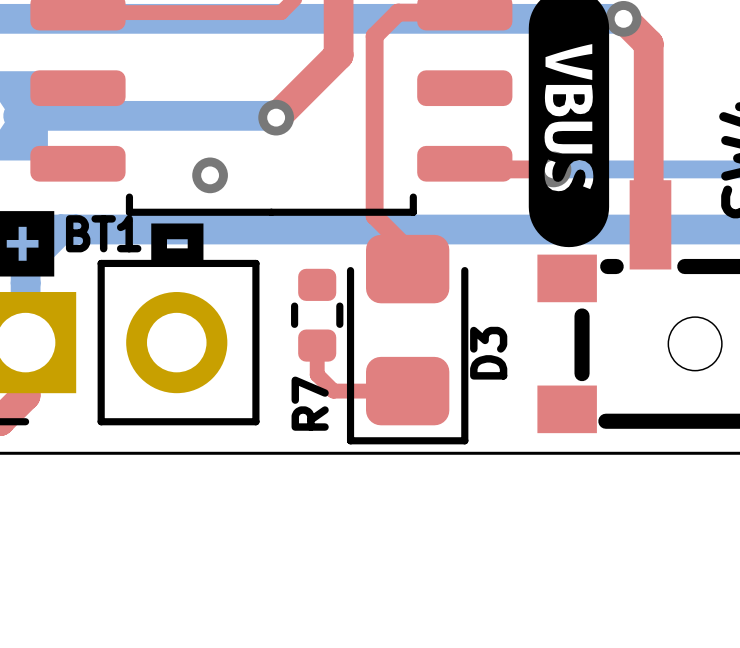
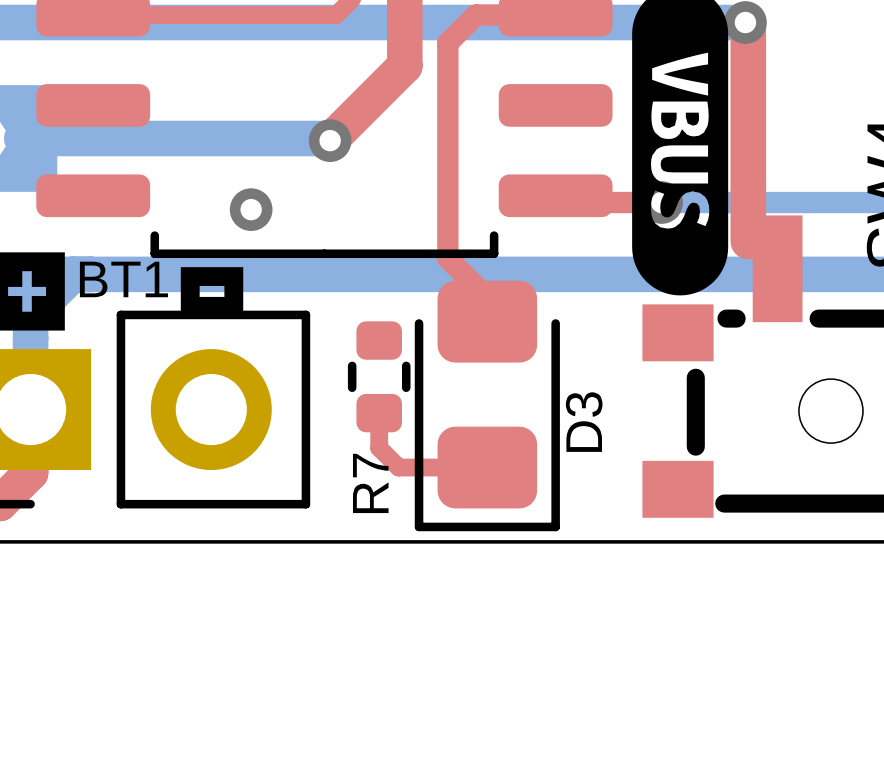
top track: (625, 21) (648, 43) (648, 223) (650, 224) -> (748, 25) (748, 241)

